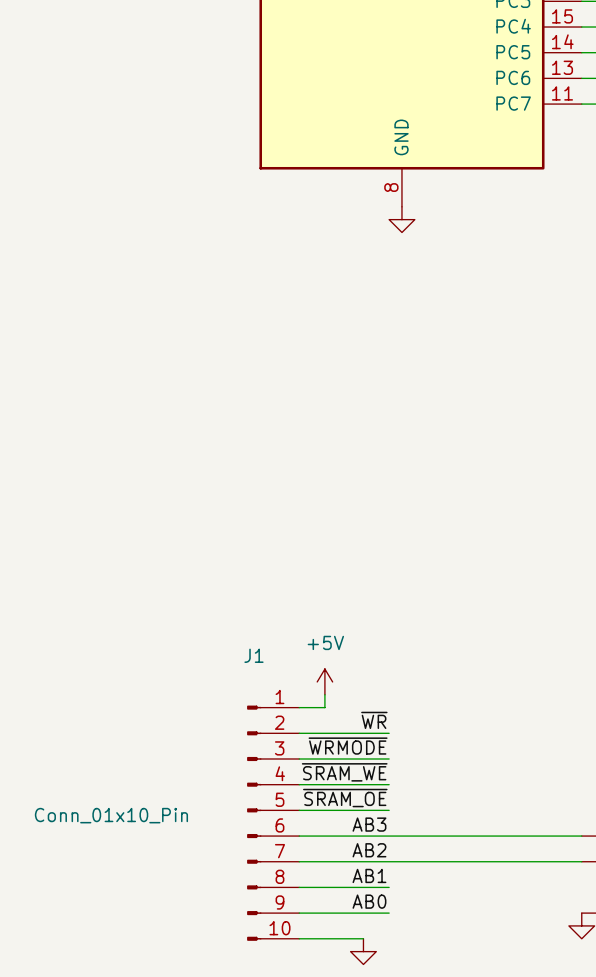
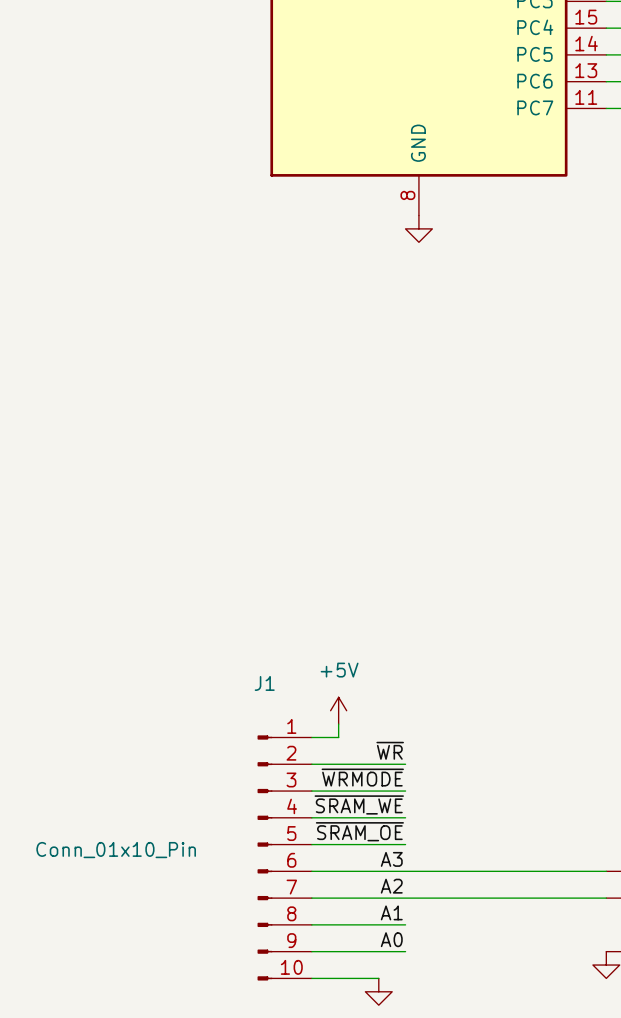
label: AB3 (369, 824) -> A3 (391, 859)
label: AB2 (369, 850) -> A2 (391, 886)
label: AB1 (369, 875) -> A1 (391, 912)
label: AB0 (369, 901) -> A0 (391, 939)

